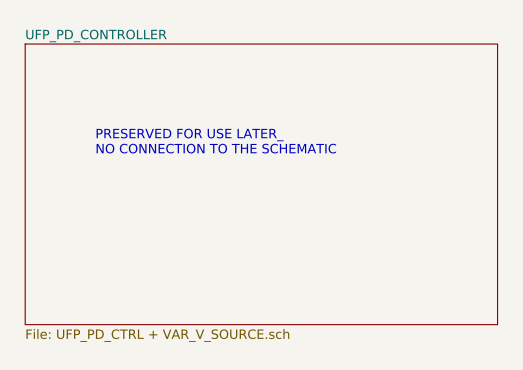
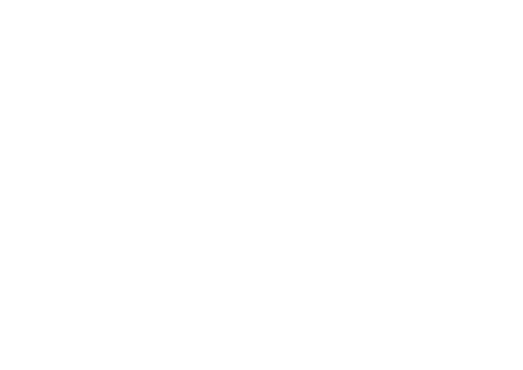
text: PRESERVED FOR USE LATER_ (190, 134) -> none
text: NO CONNECTION TO THE SCHEMATIC (216, 148) -> none
sheet UFP_PD_CONTROLLER: File: UFP_PD_CTRL + VAR_V_SOURCE.sch (261, 184) -> none

